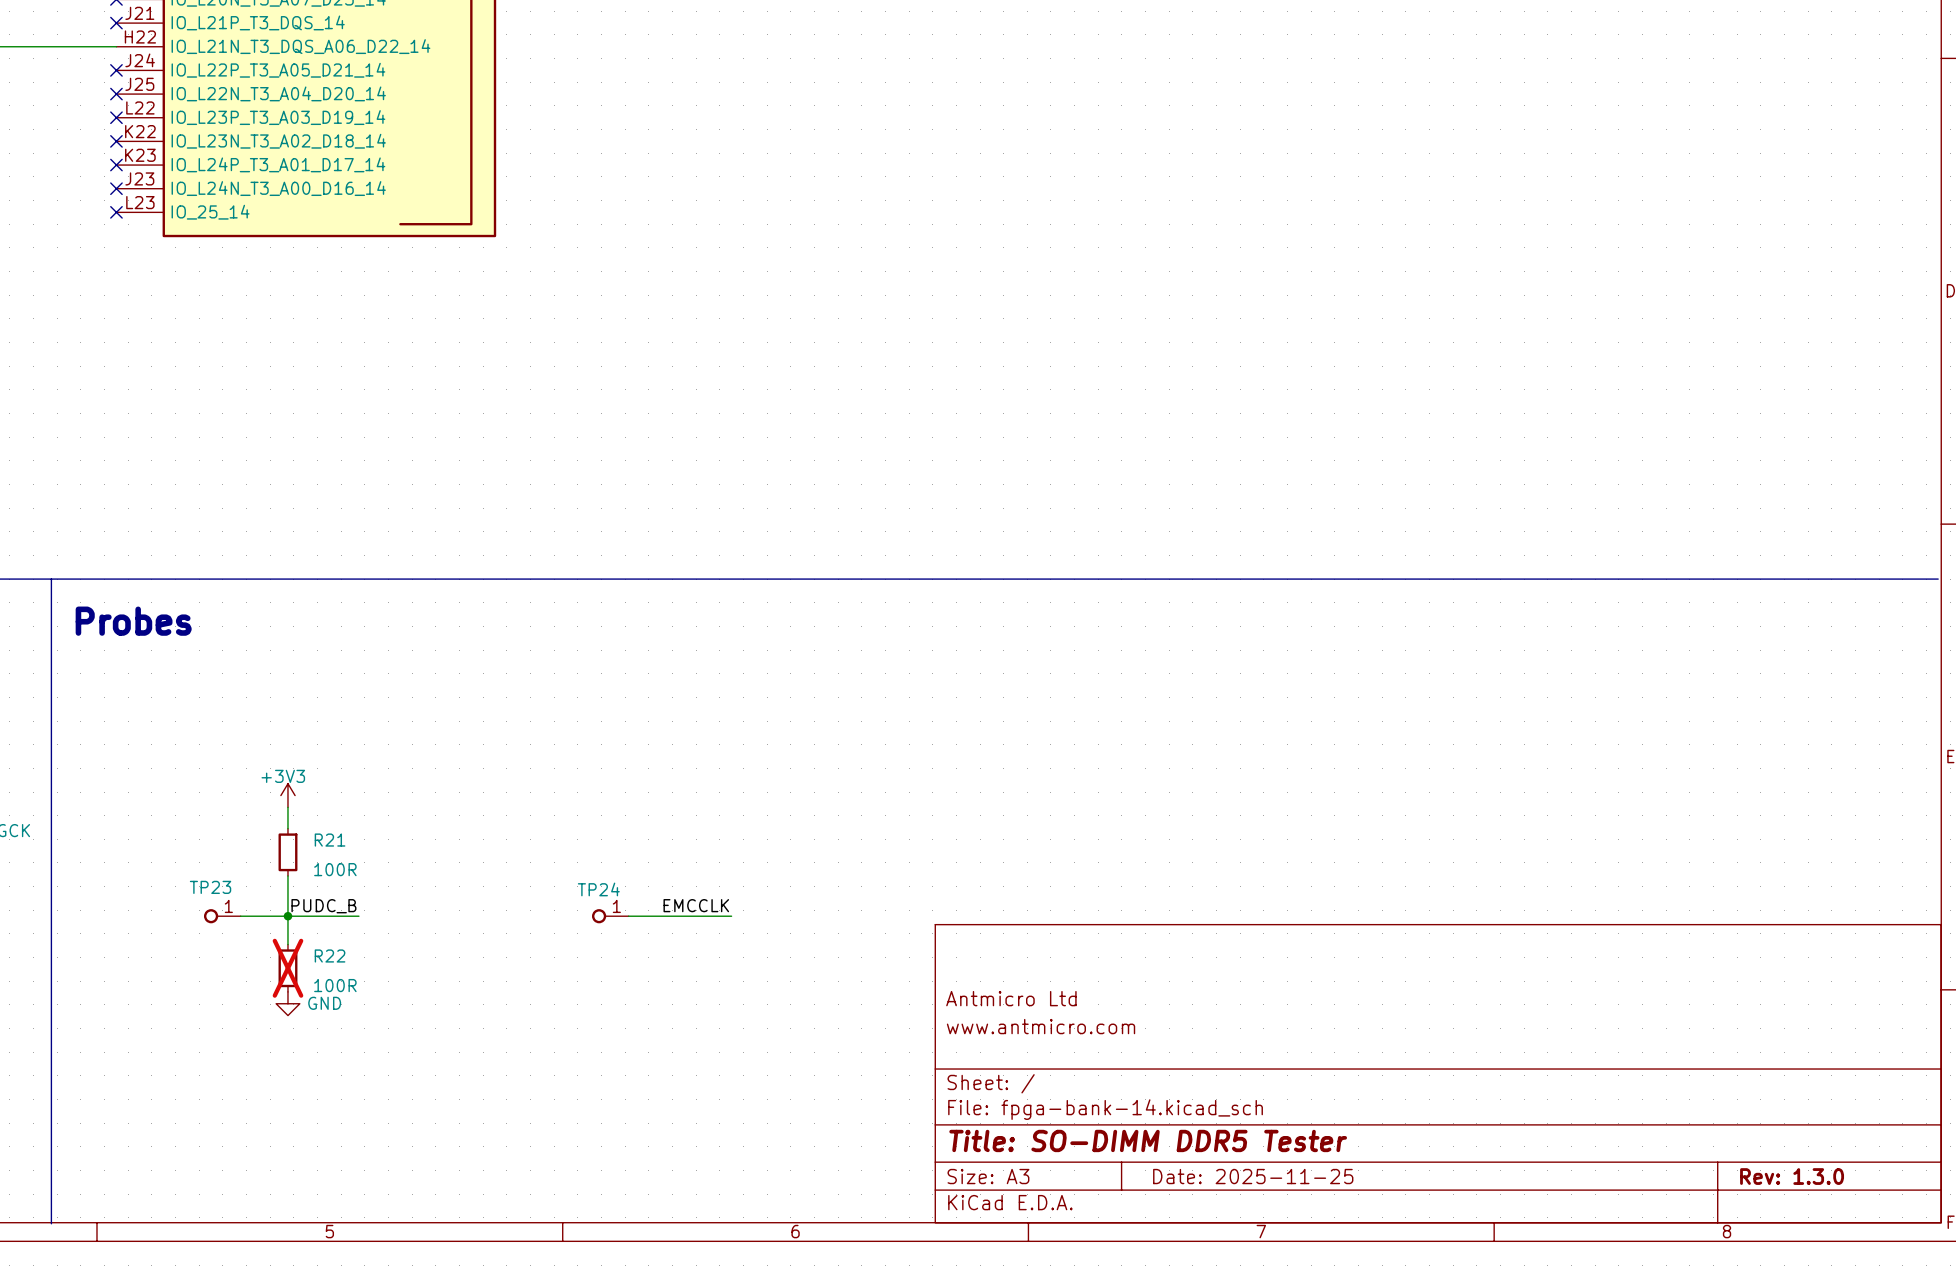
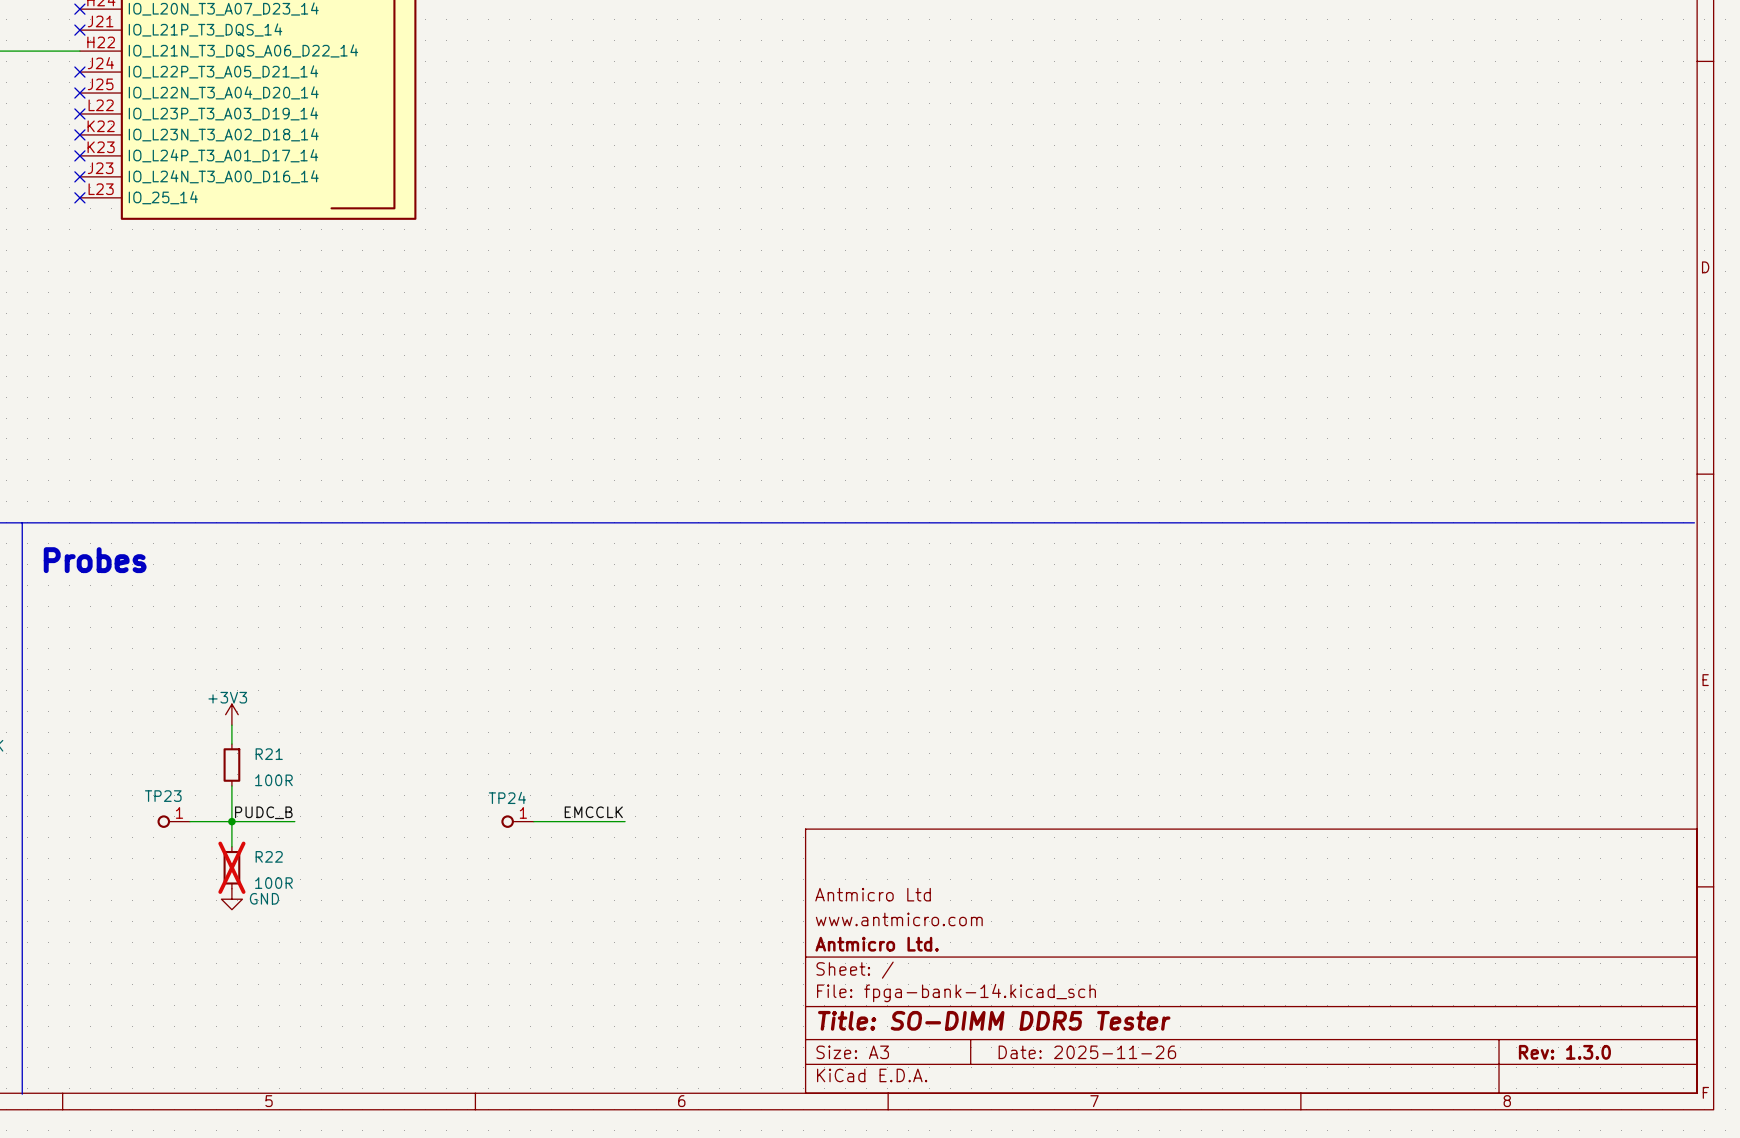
title block: none -> Antmicro Ltd. (877, 944)
title block: Date: 2025-11-25 (1253, 1176) -> Date: 2025-11-26 (1087, 1052)

